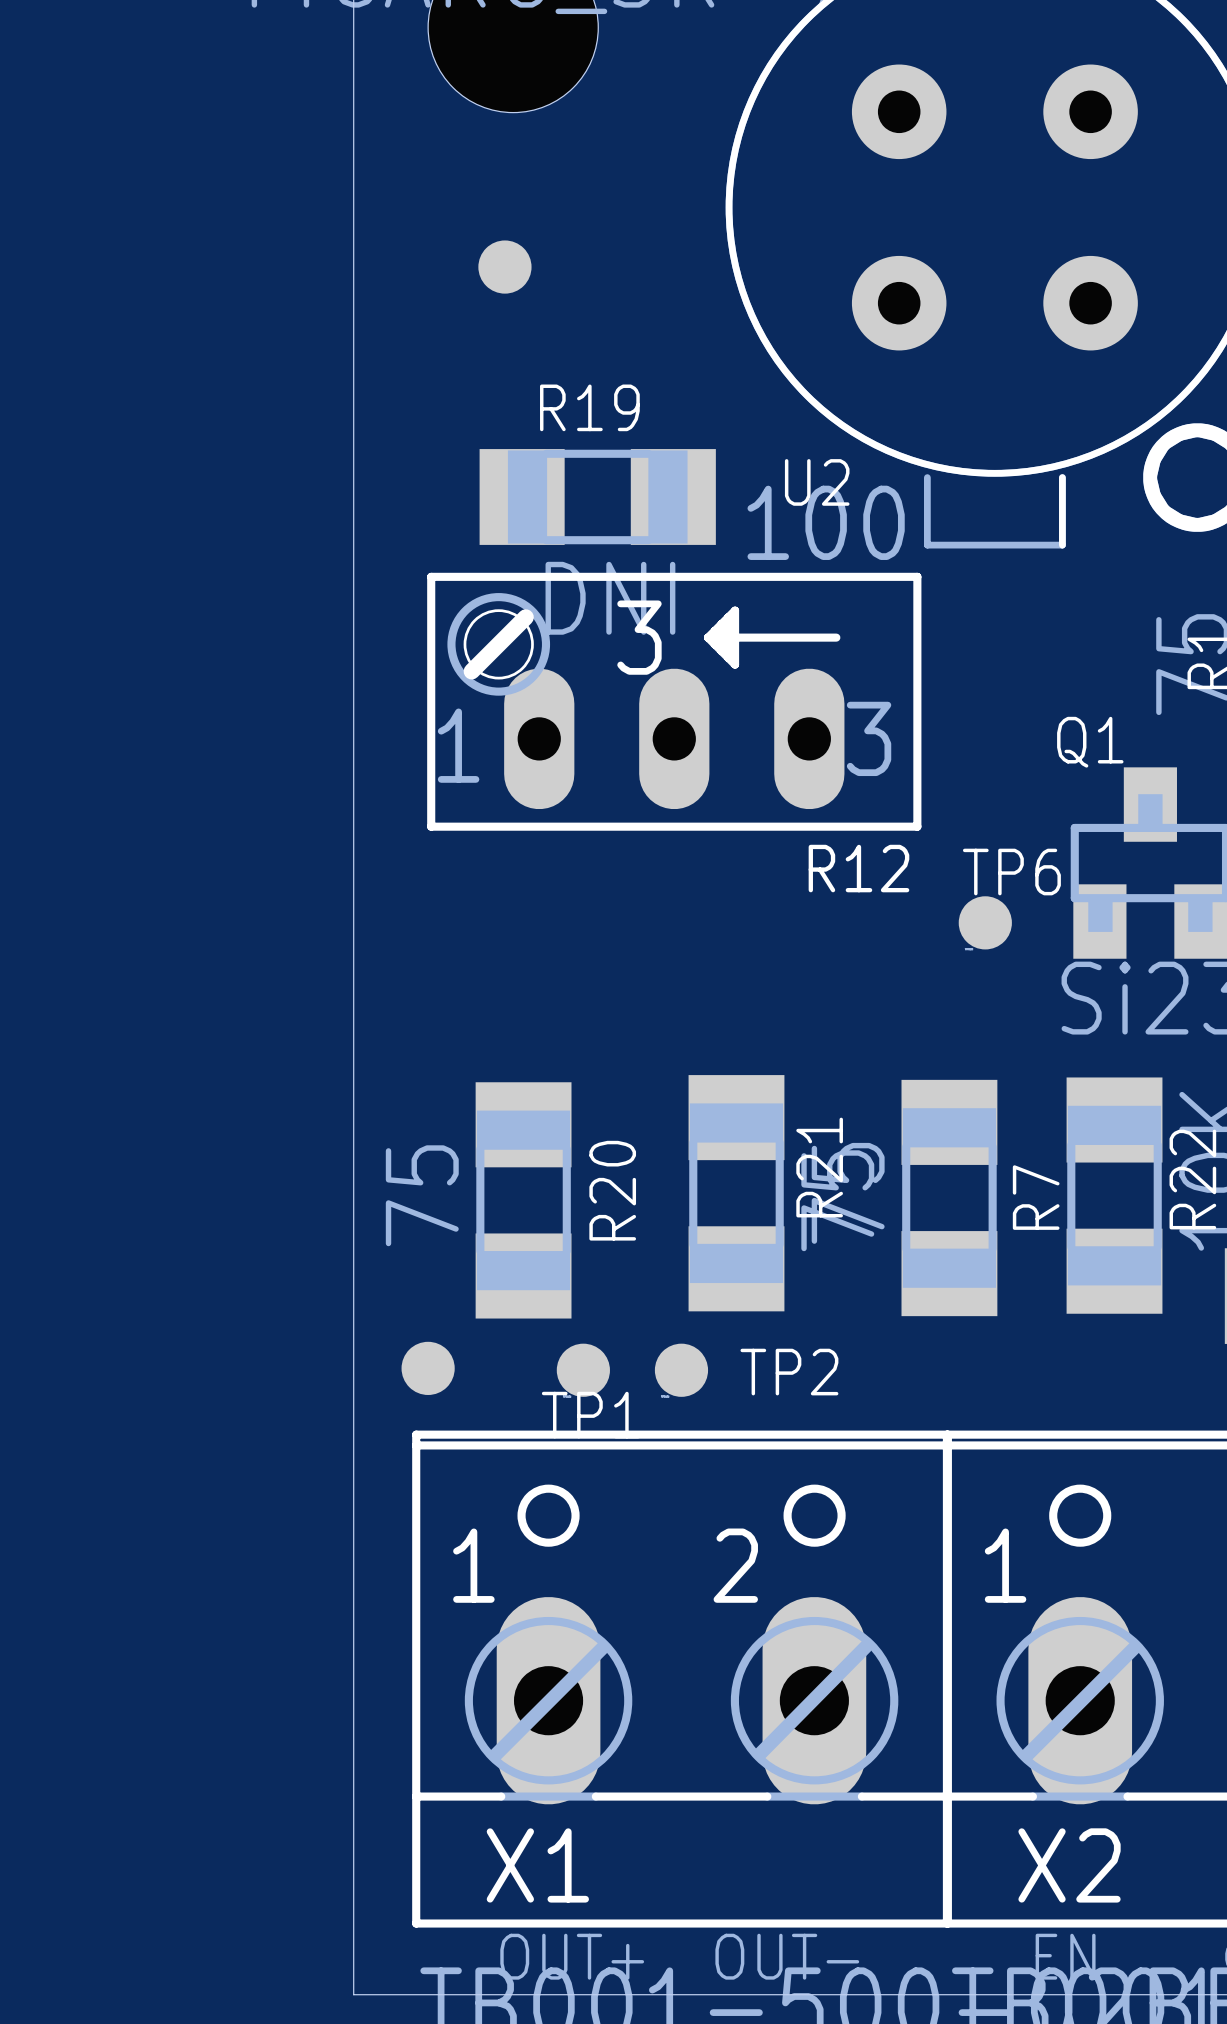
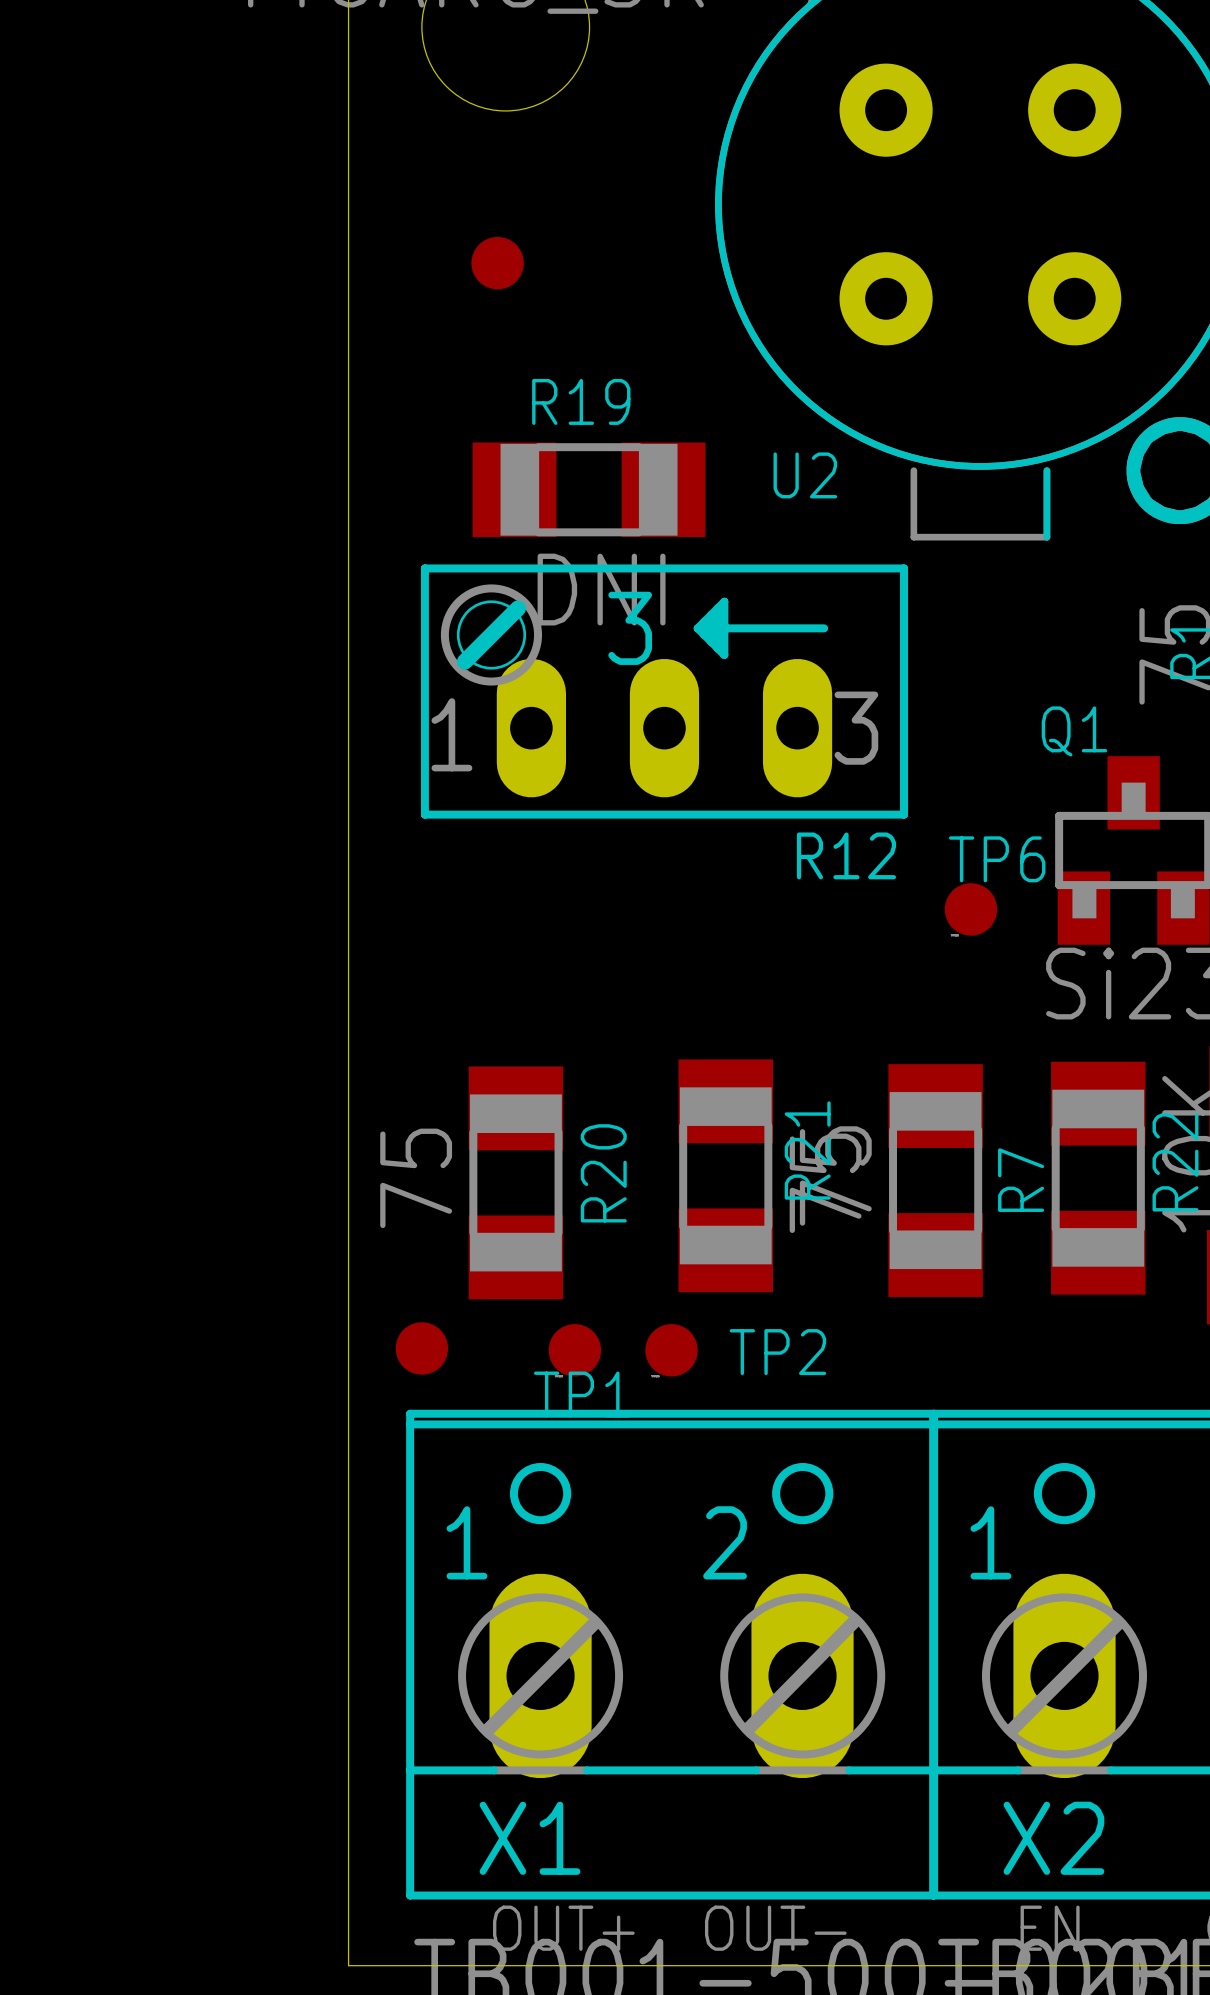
R12 value: 100 (826, 522) -> none

